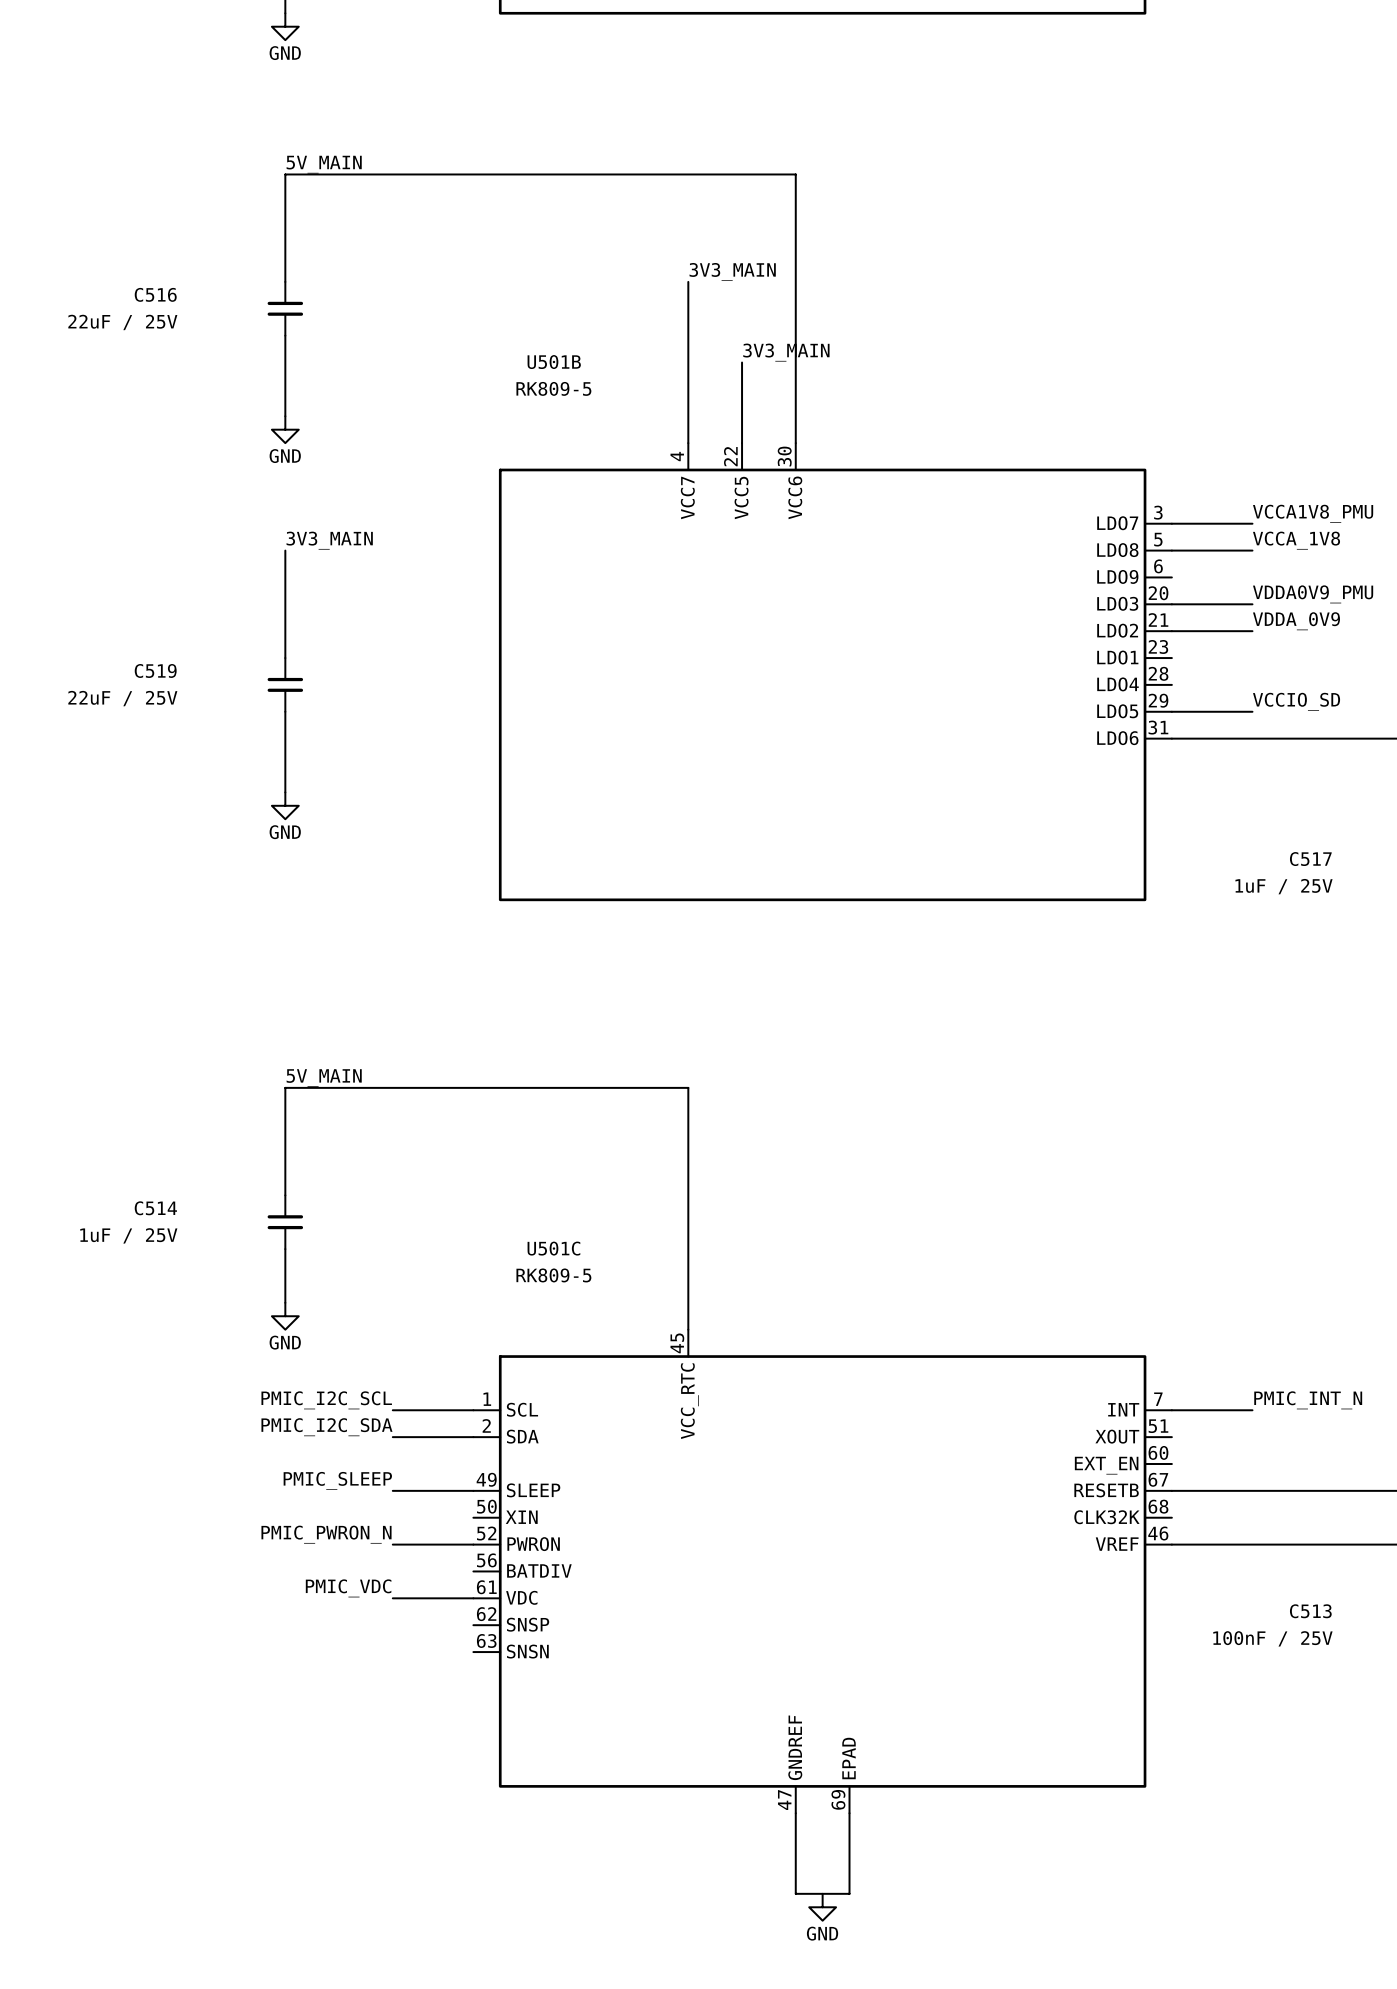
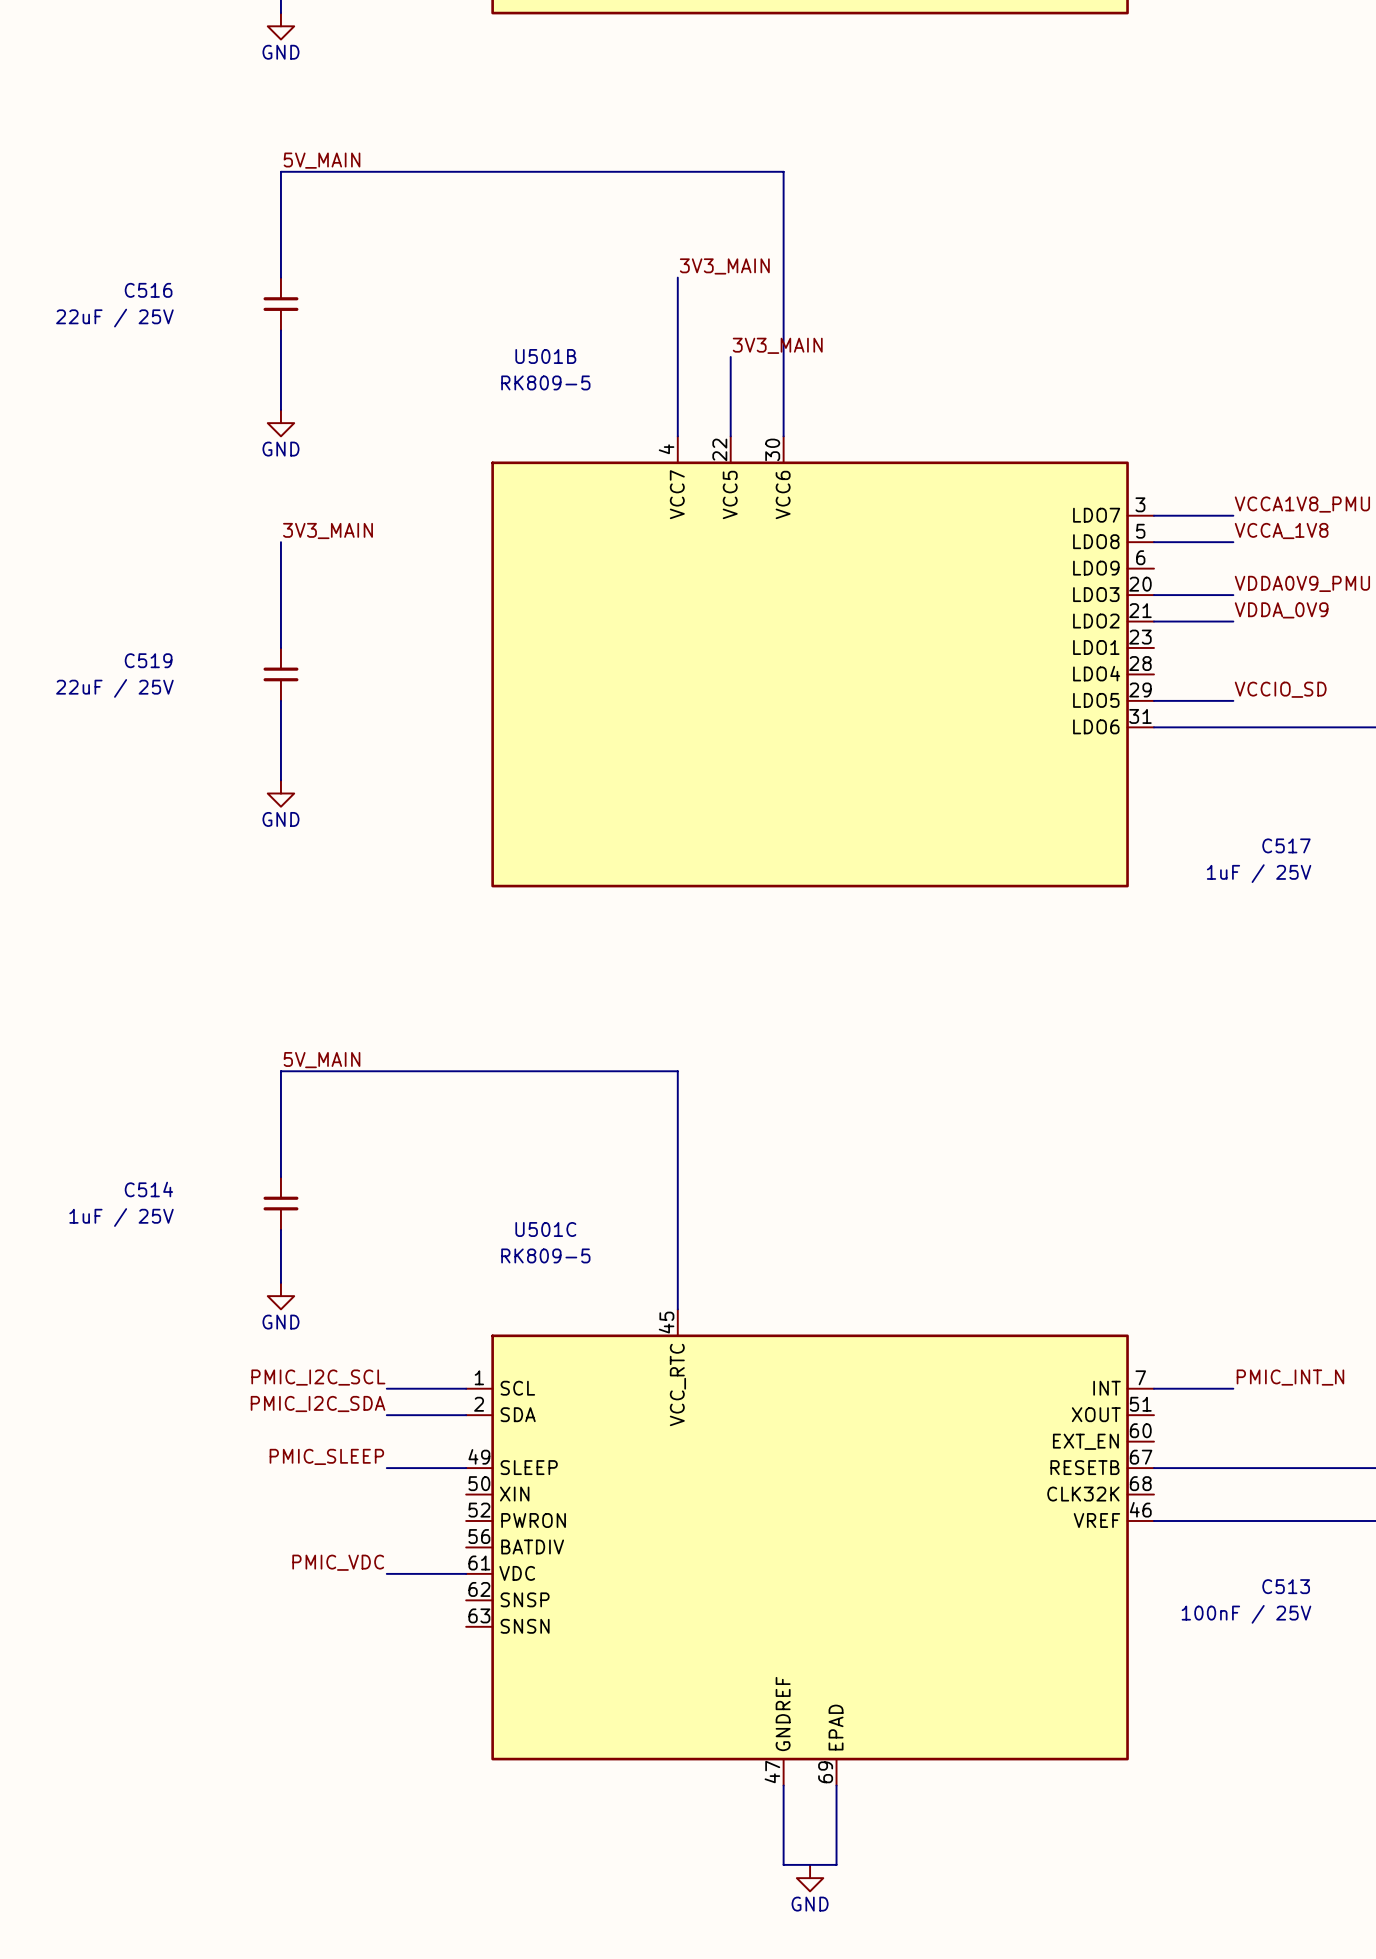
label: PMIC_PWRON_N (326, 1534) -> none
wire: (392, 1544) (473, 1544) -> none

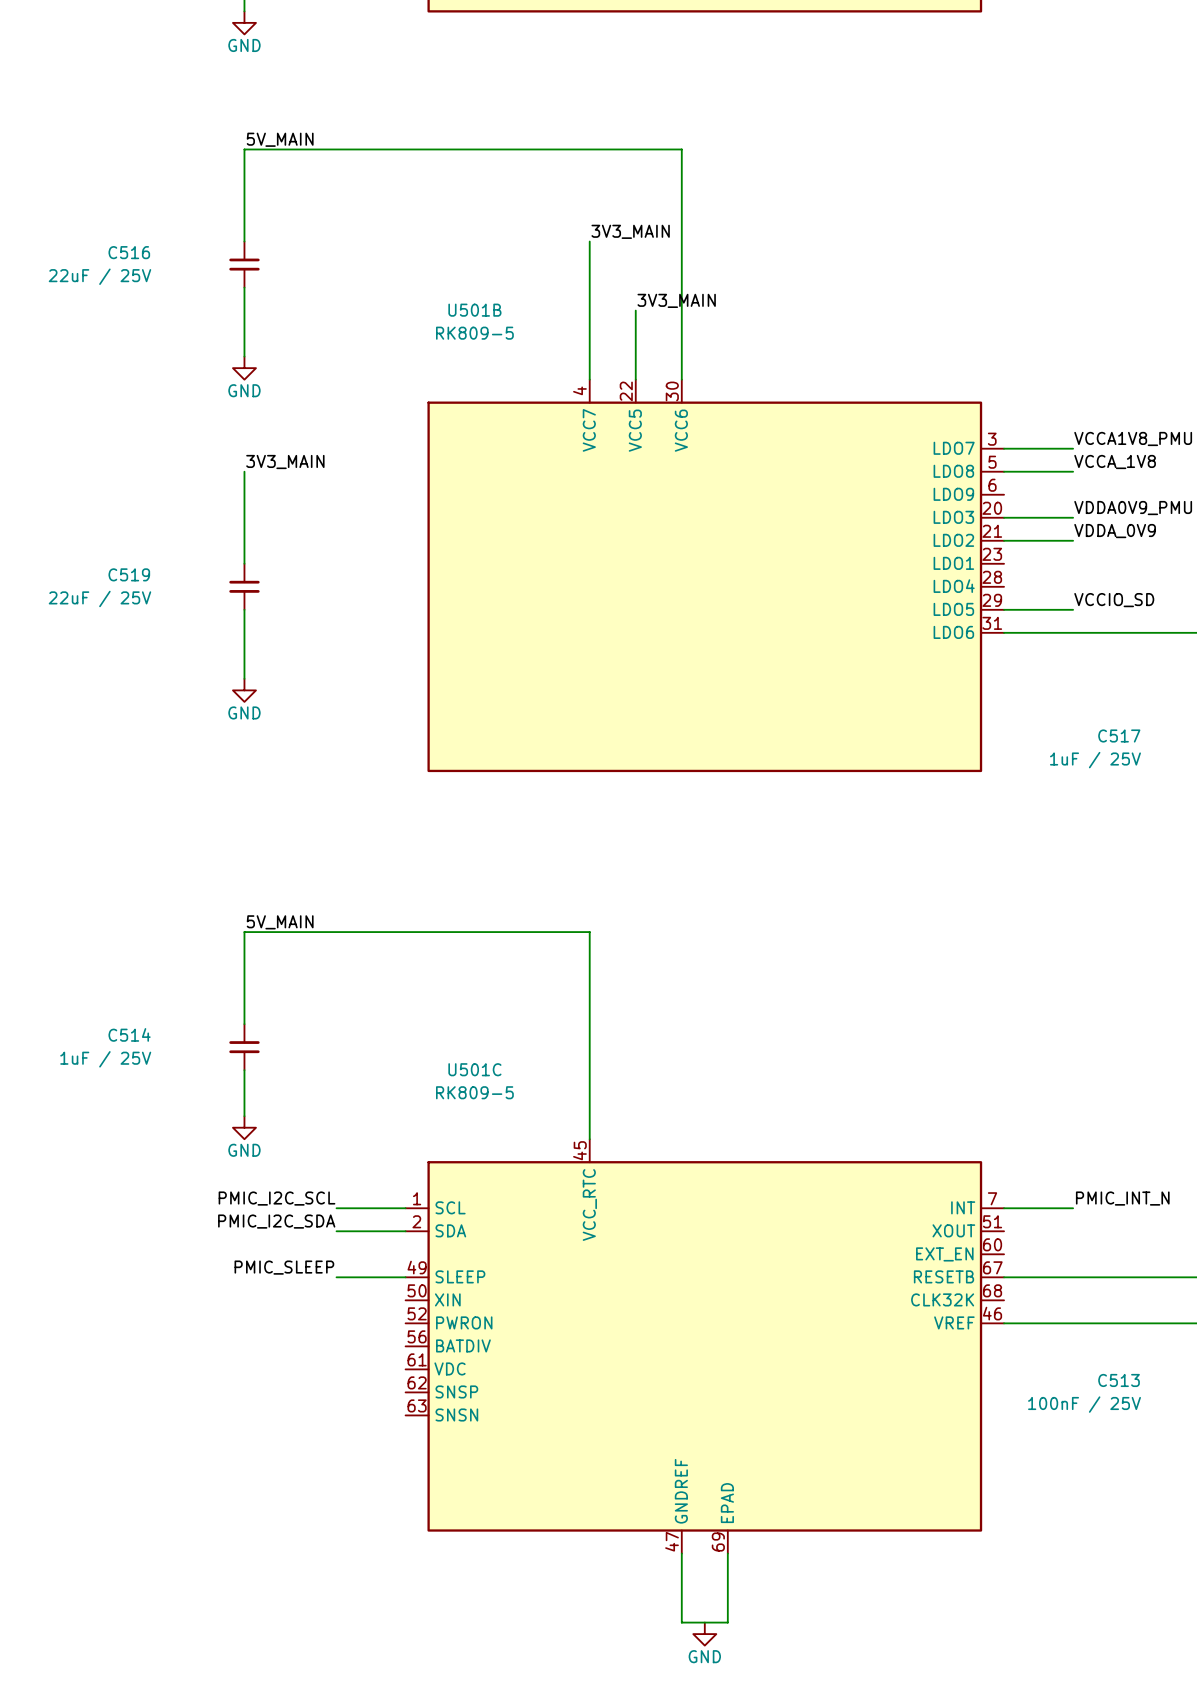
label: PMIC_VDC (338, 1562) -> none
wire: (386, 1573) (466, 1573) -> none

